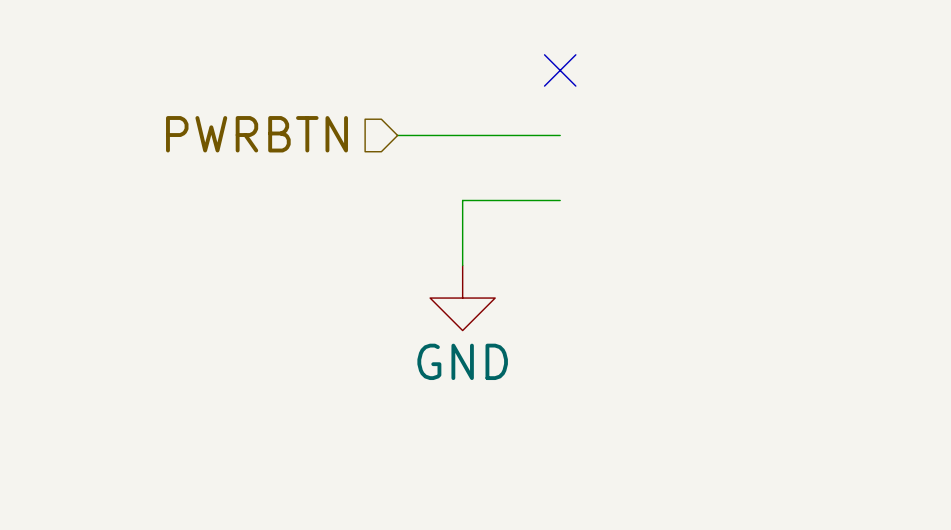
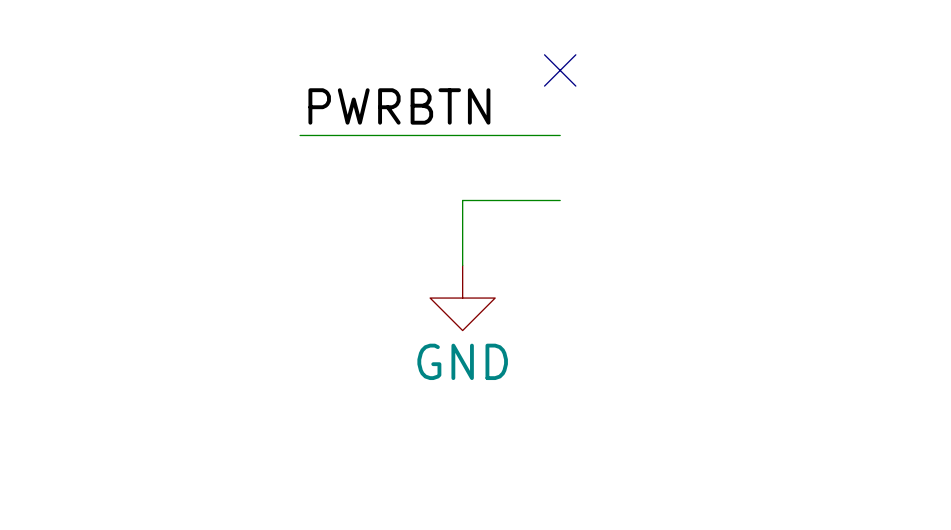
label: none -> PWRBTN (399, 106)
hierarchical label: PWRBTN (257, 134) -> none
wire: none -> (300, 135) (397, 135)

